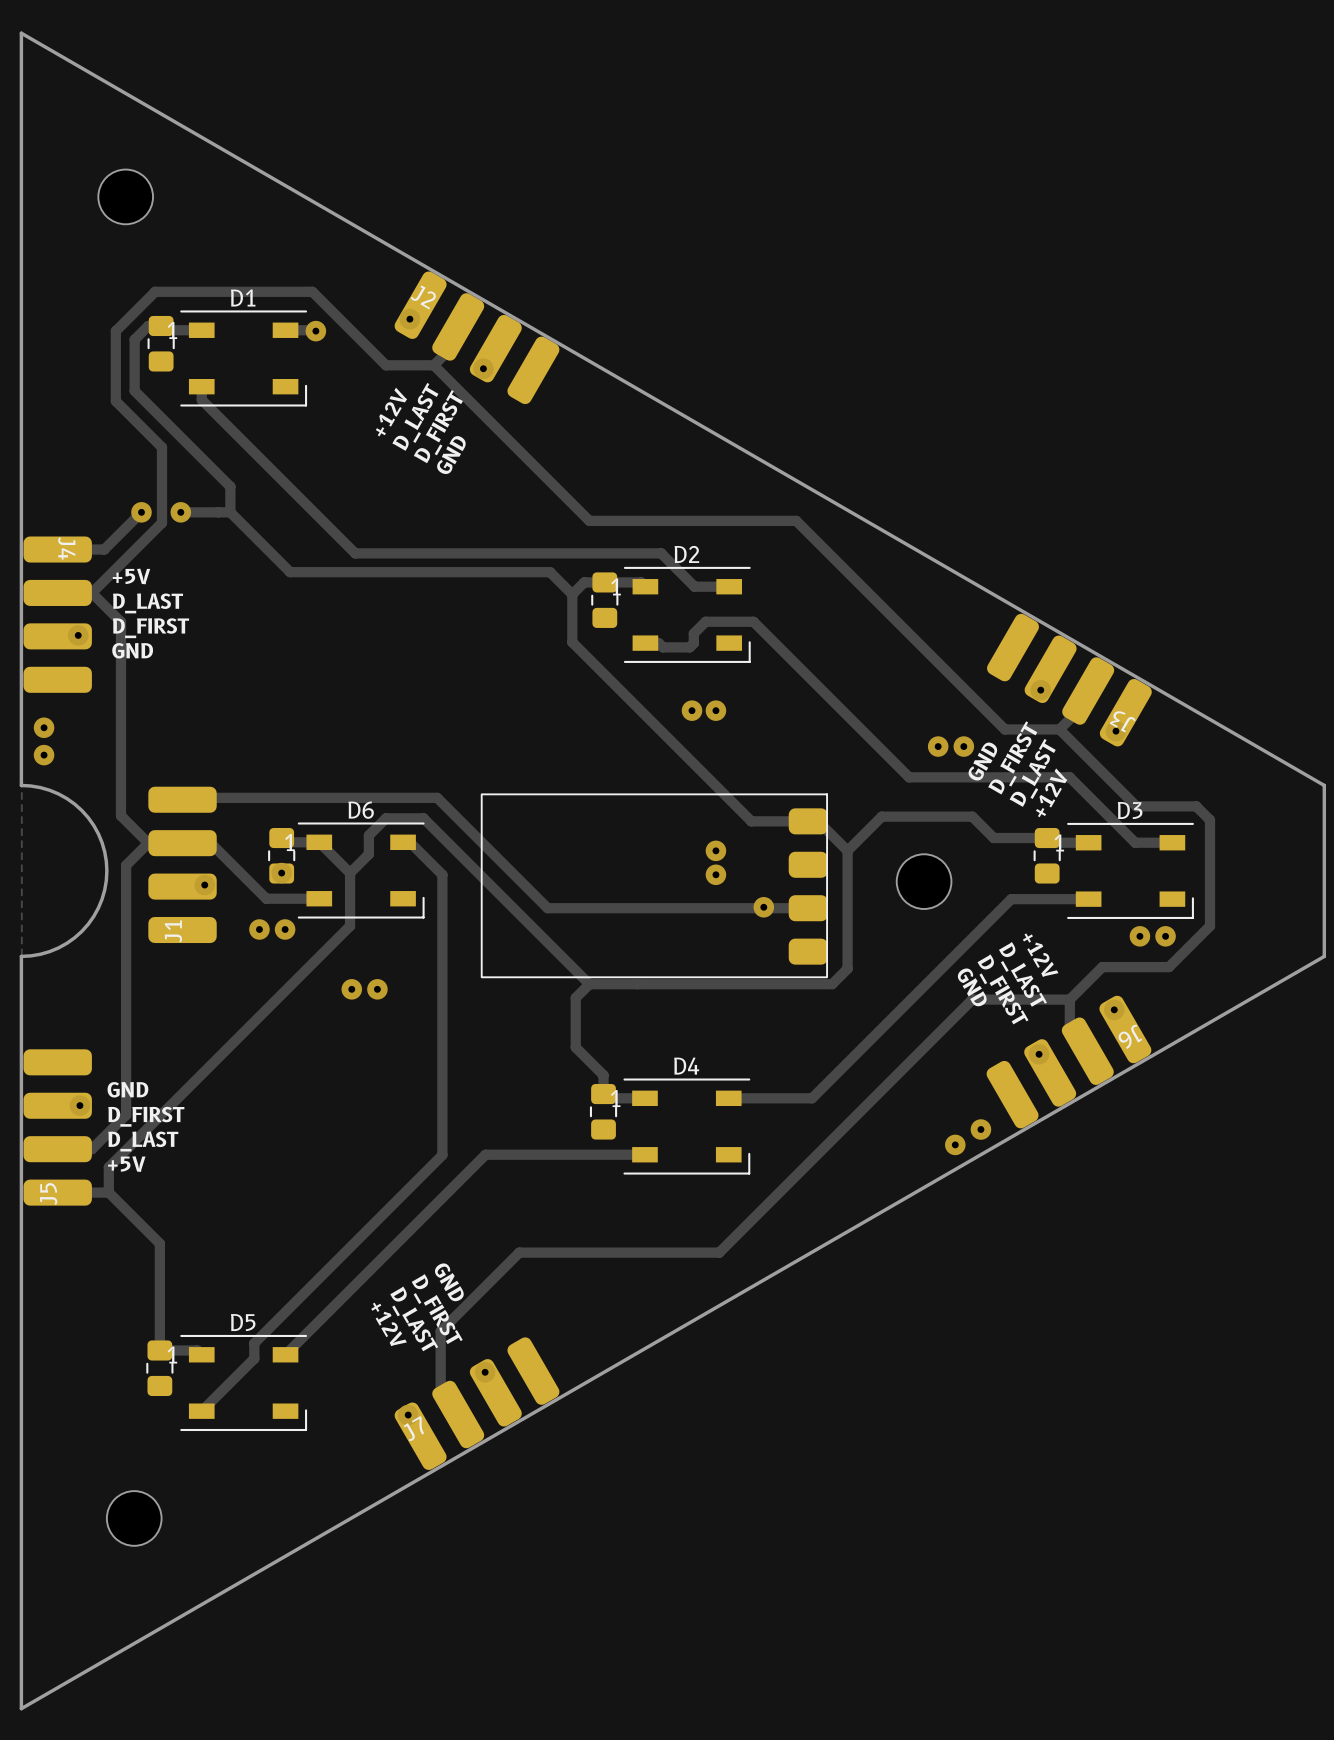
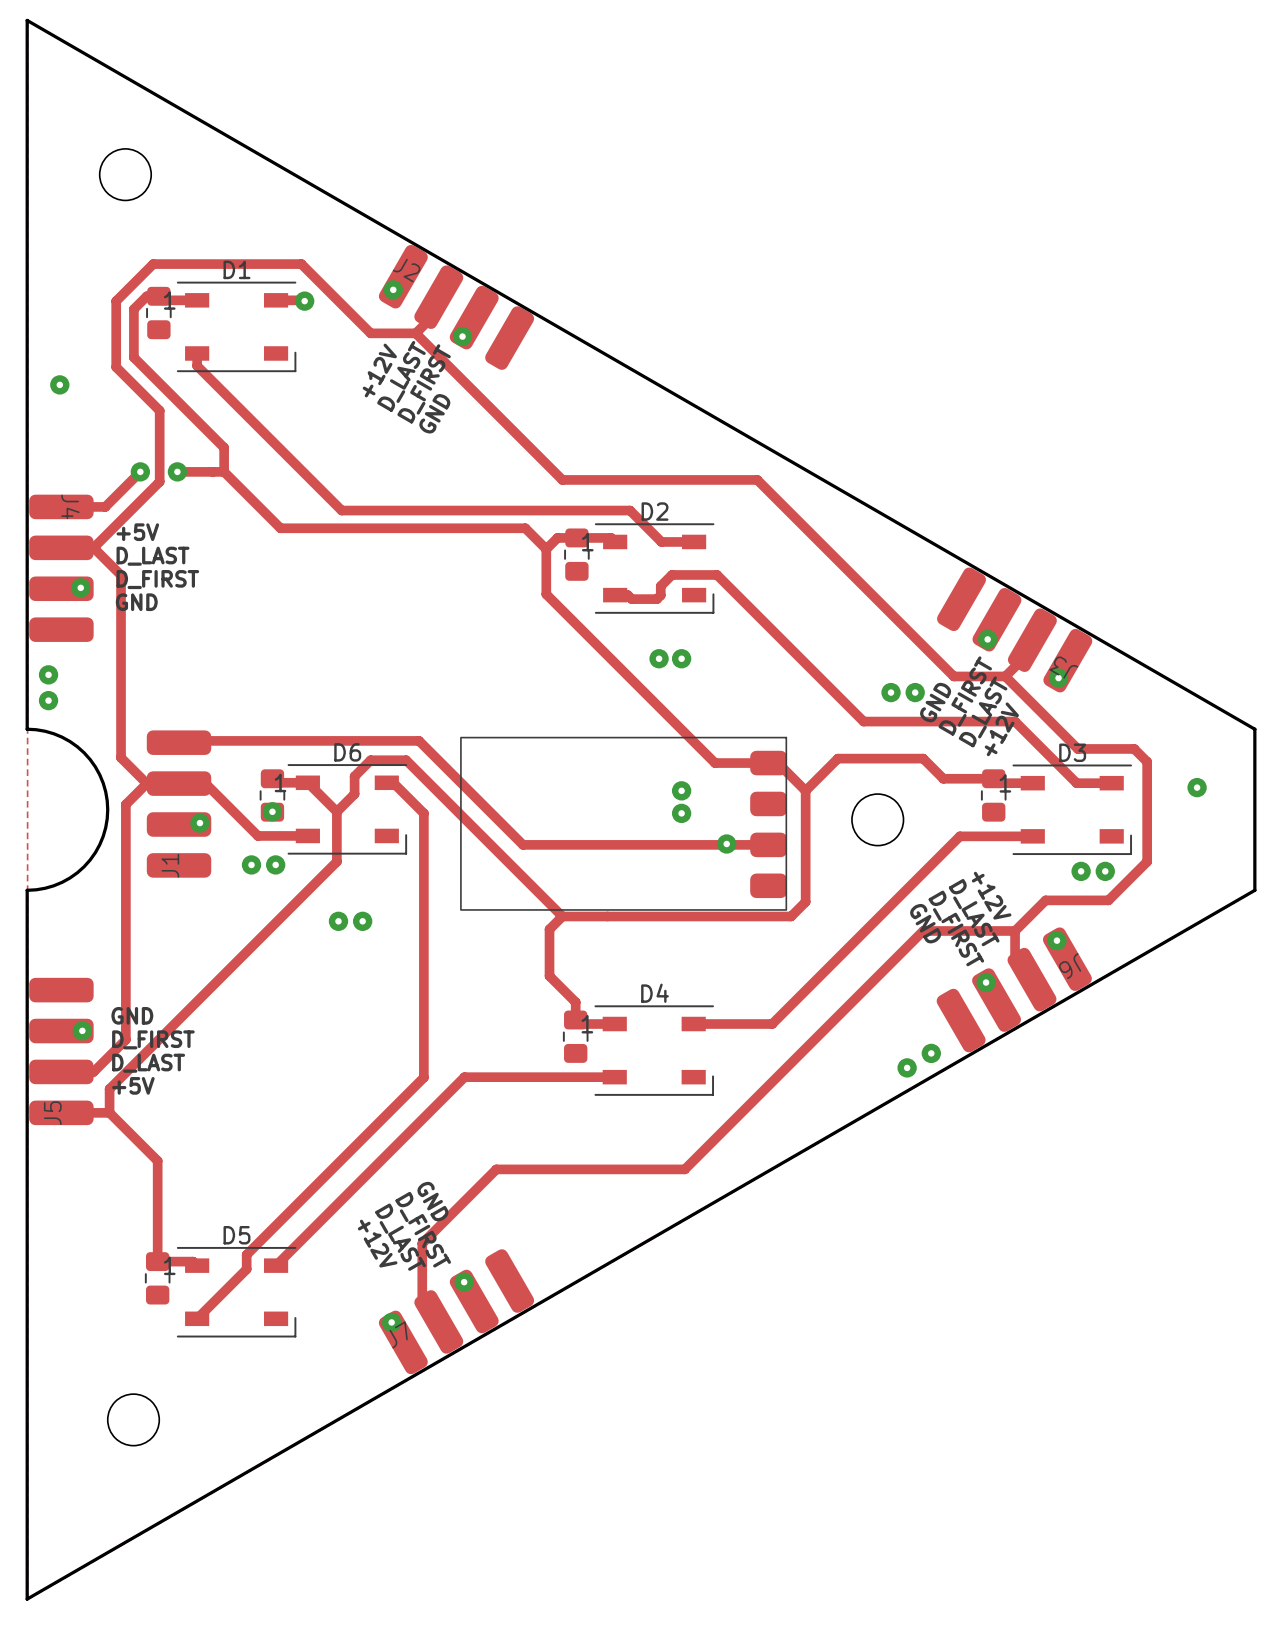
via: none -> (59, 384)
via: none -> (1197, 787)

